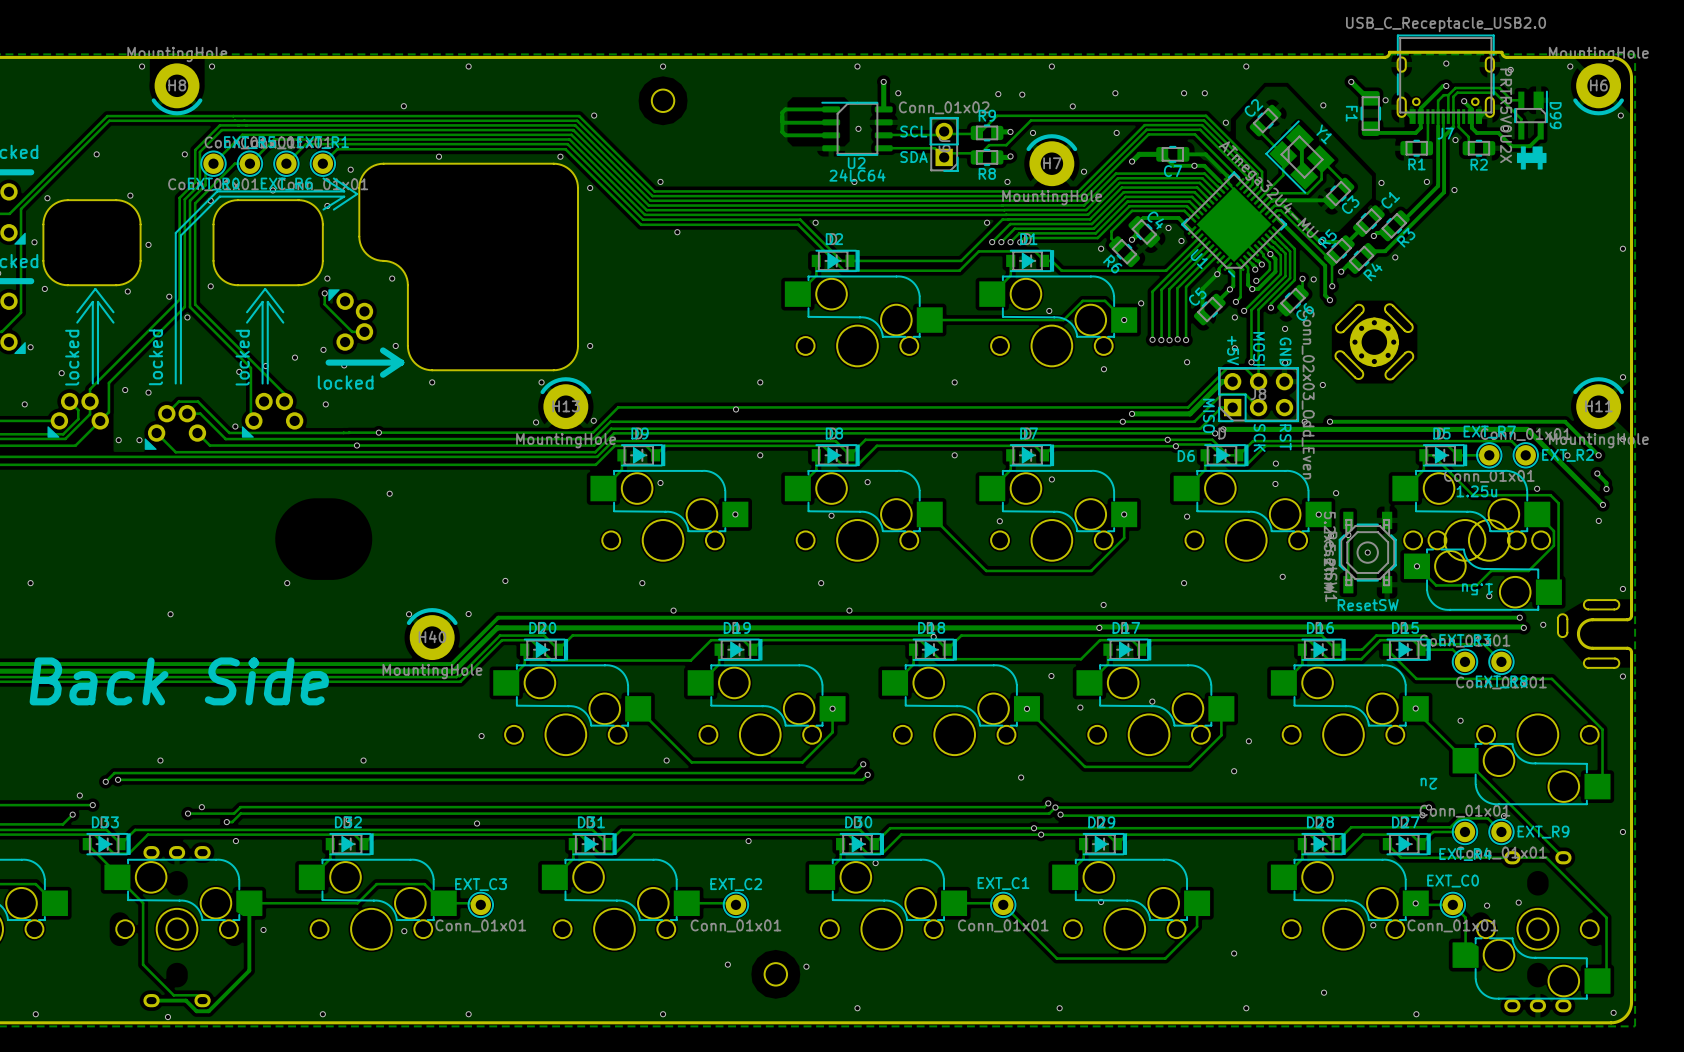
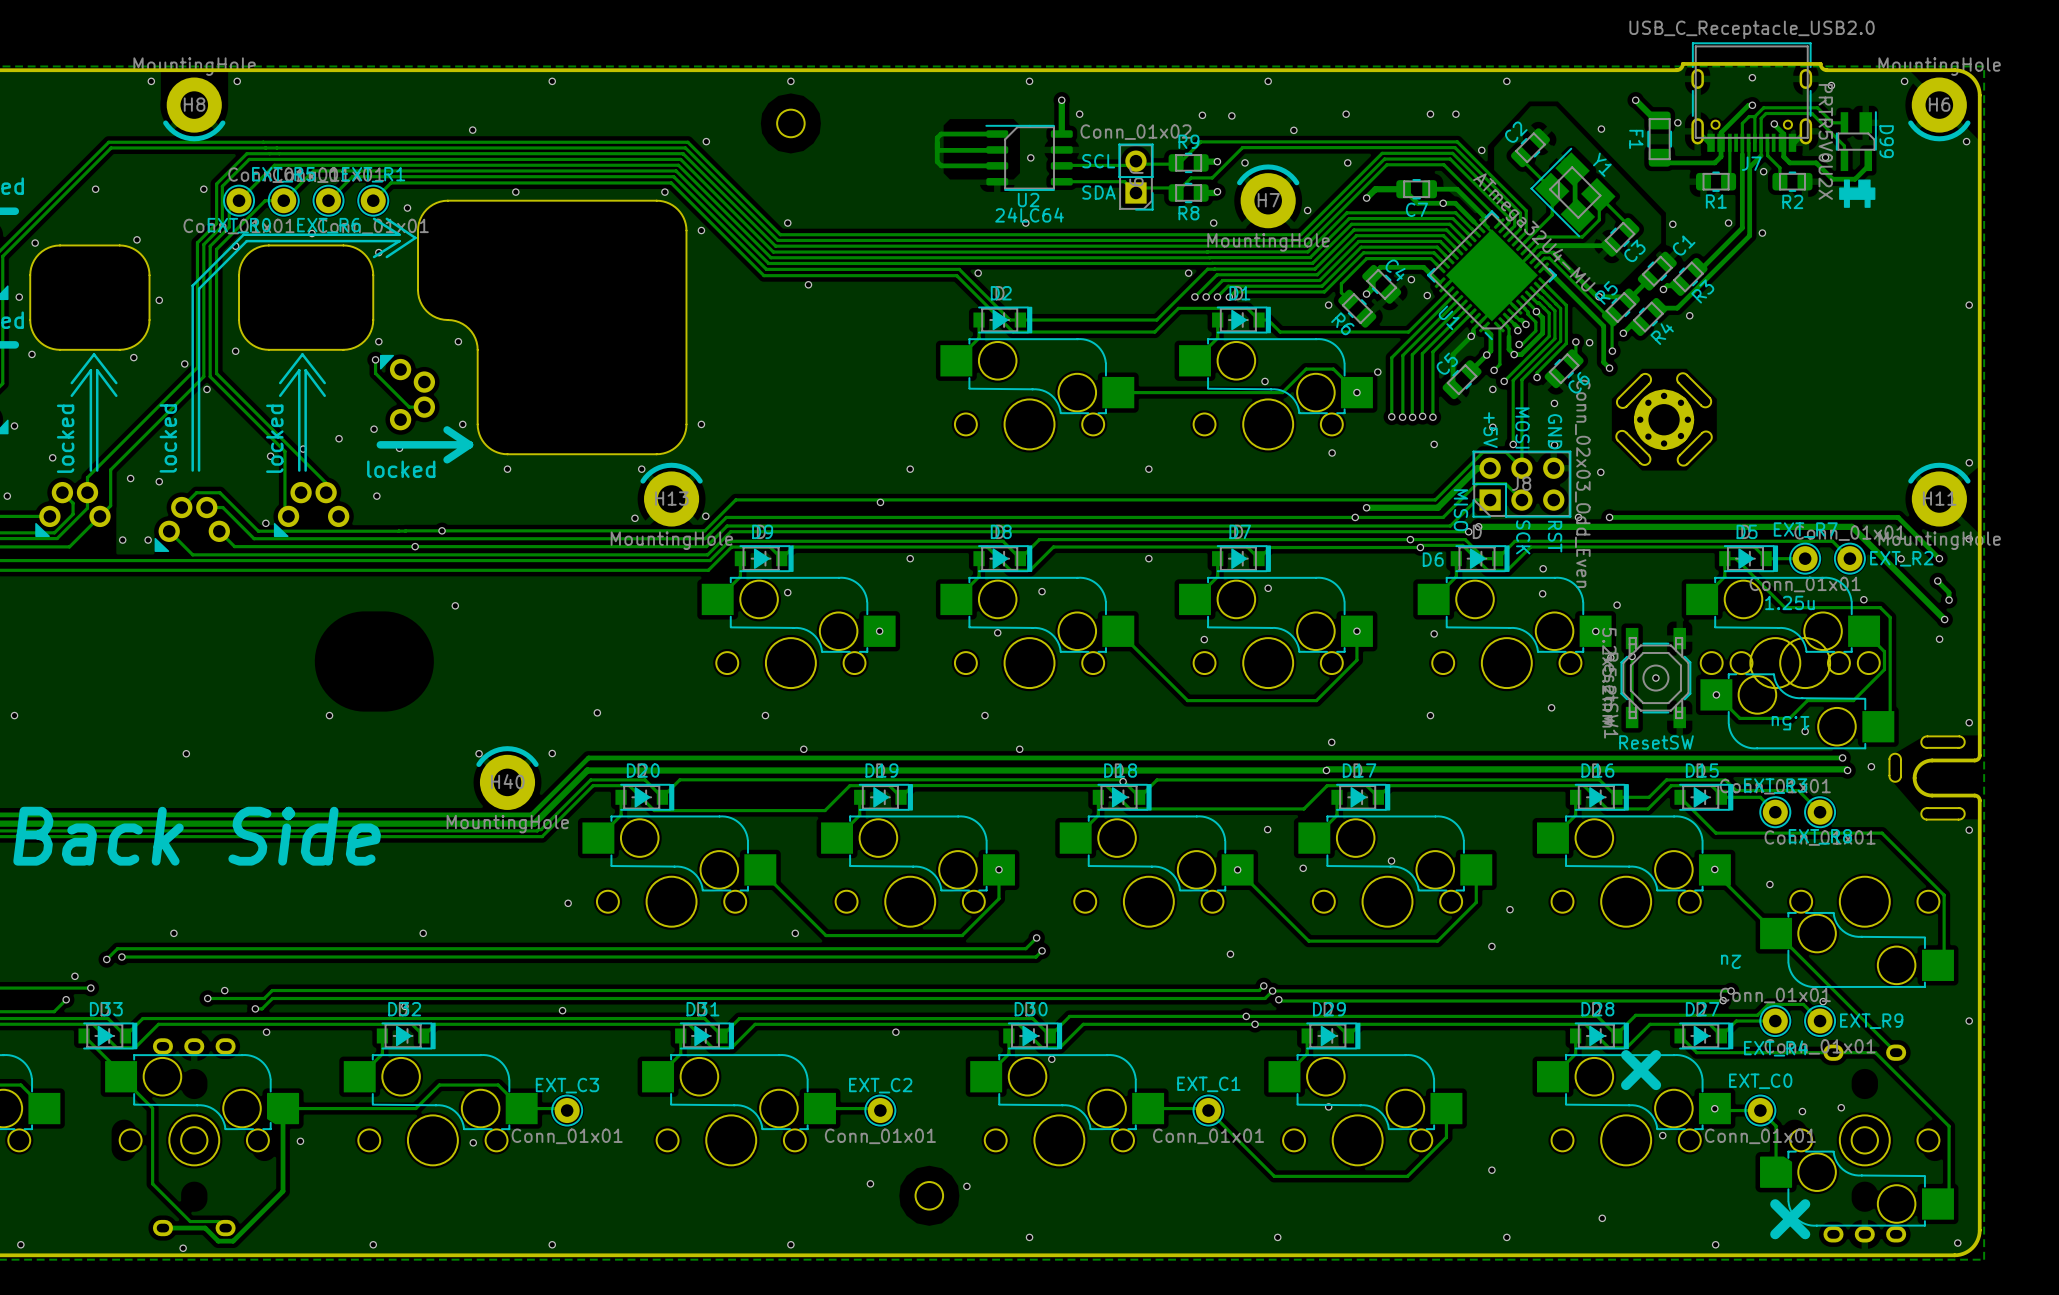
text: none -> × (1641, 1070)
text: none -> × (1790, 1219)

